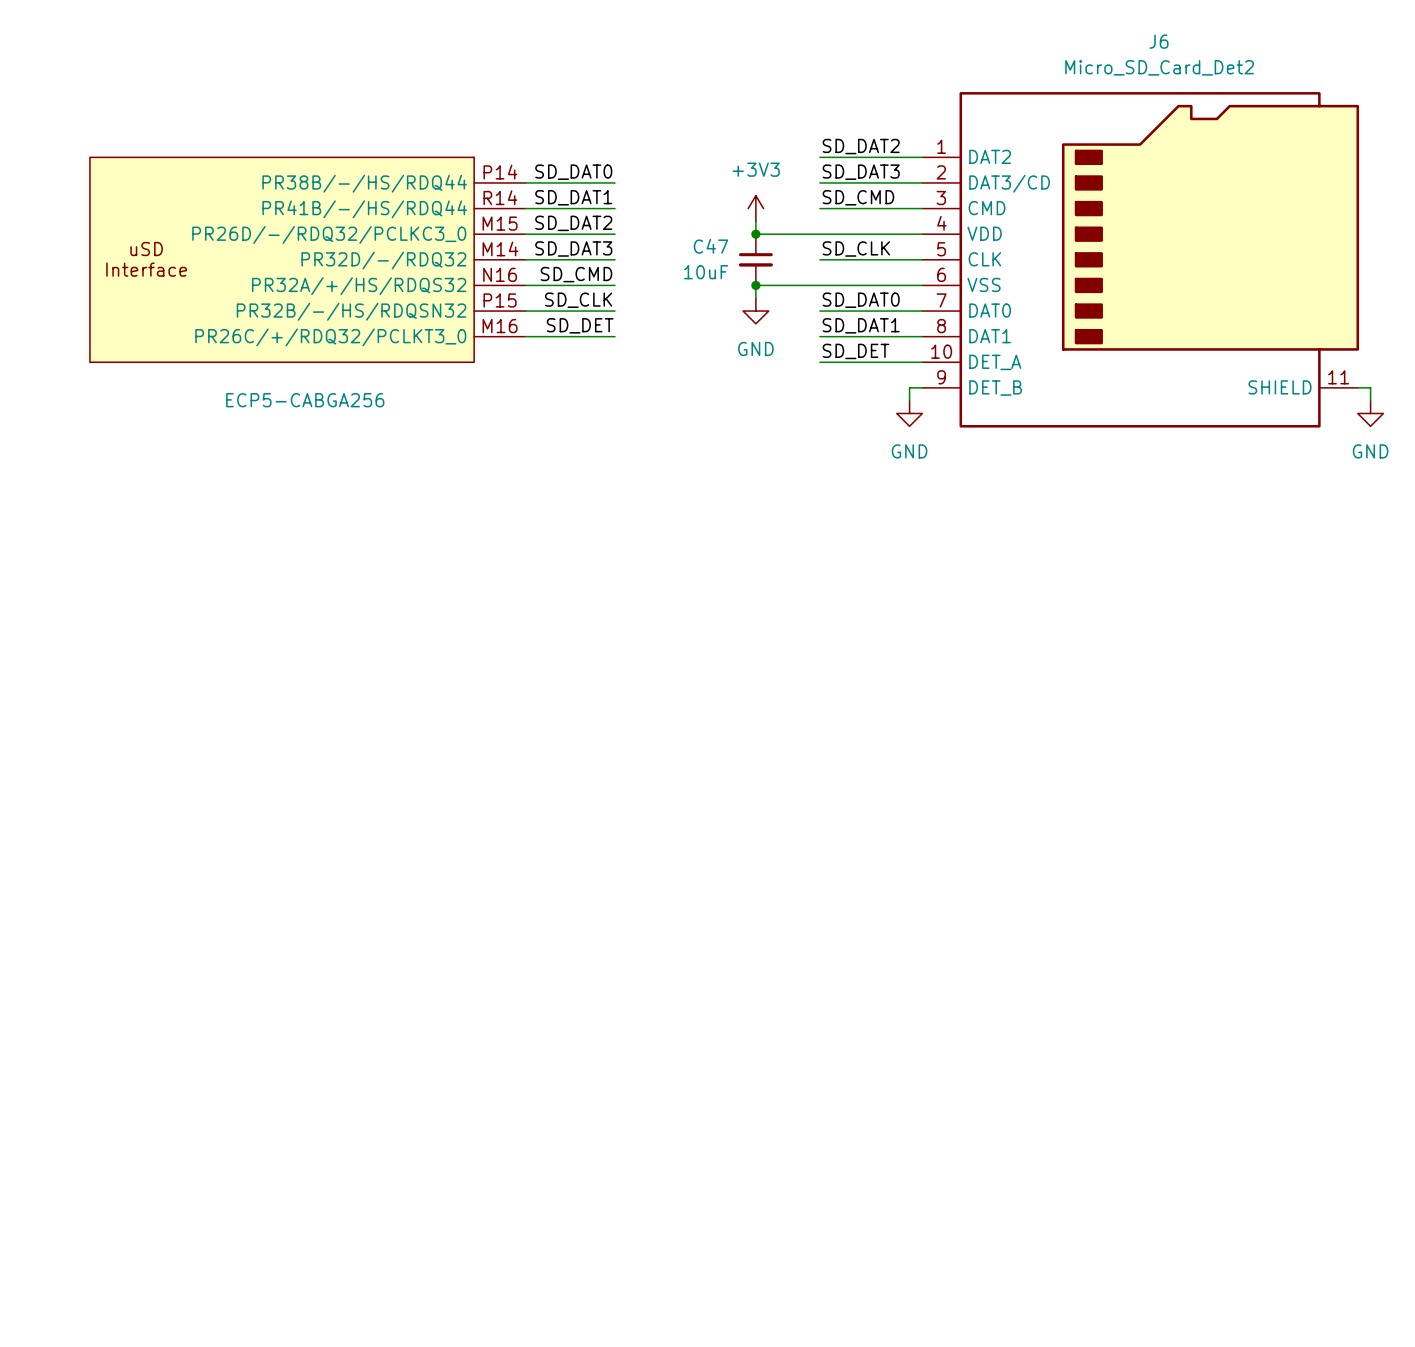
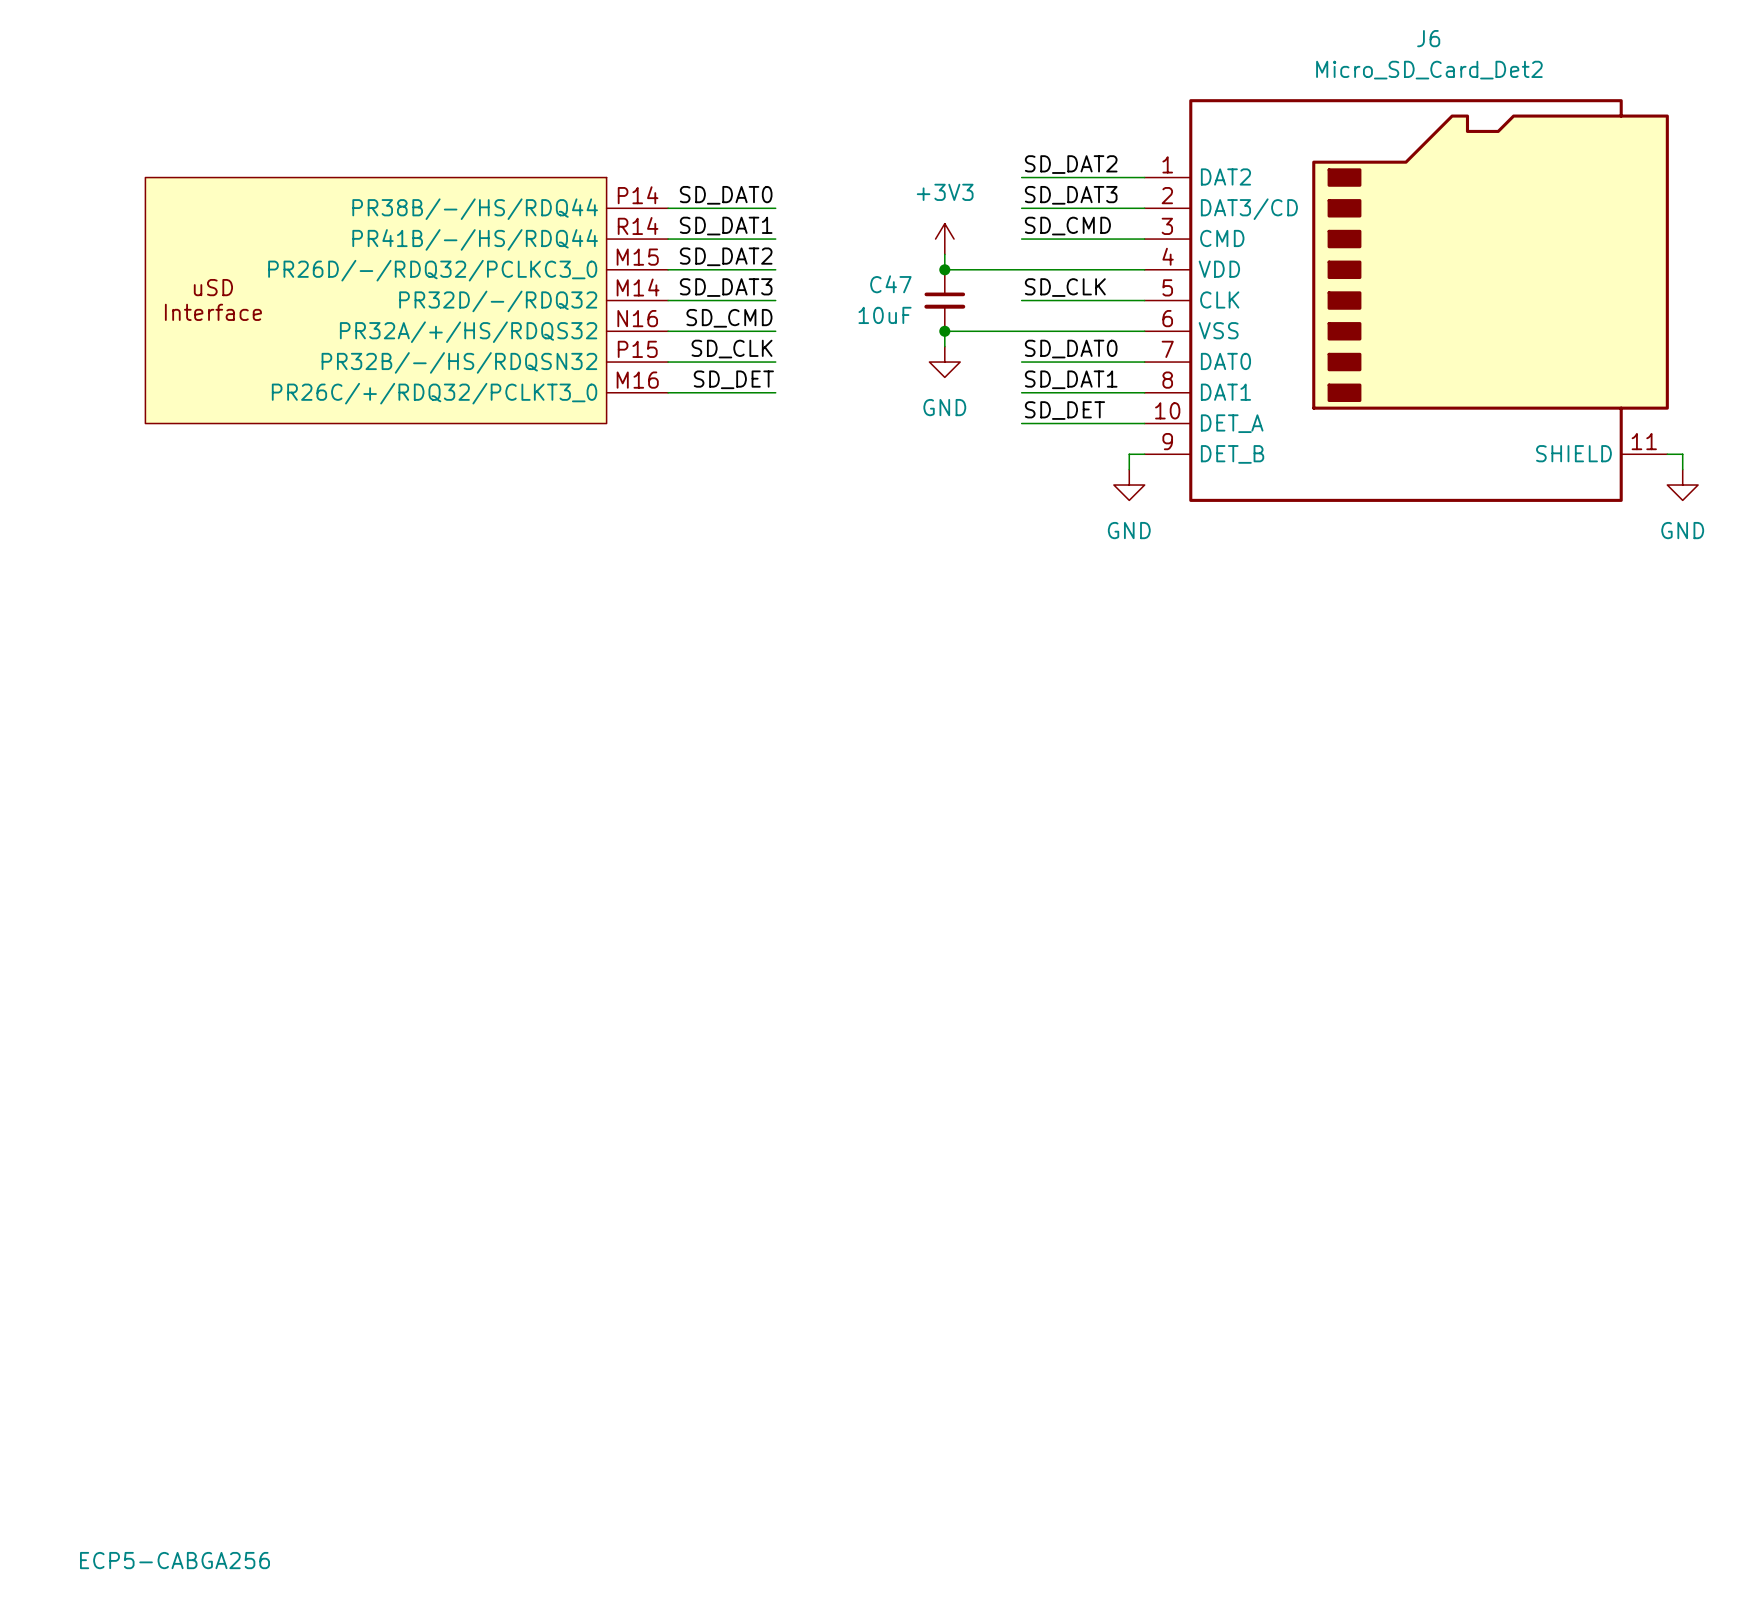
part value position: ECP5-CABGA256 (305, 400) -> ECP5-CABGA256 (174, 1560)

